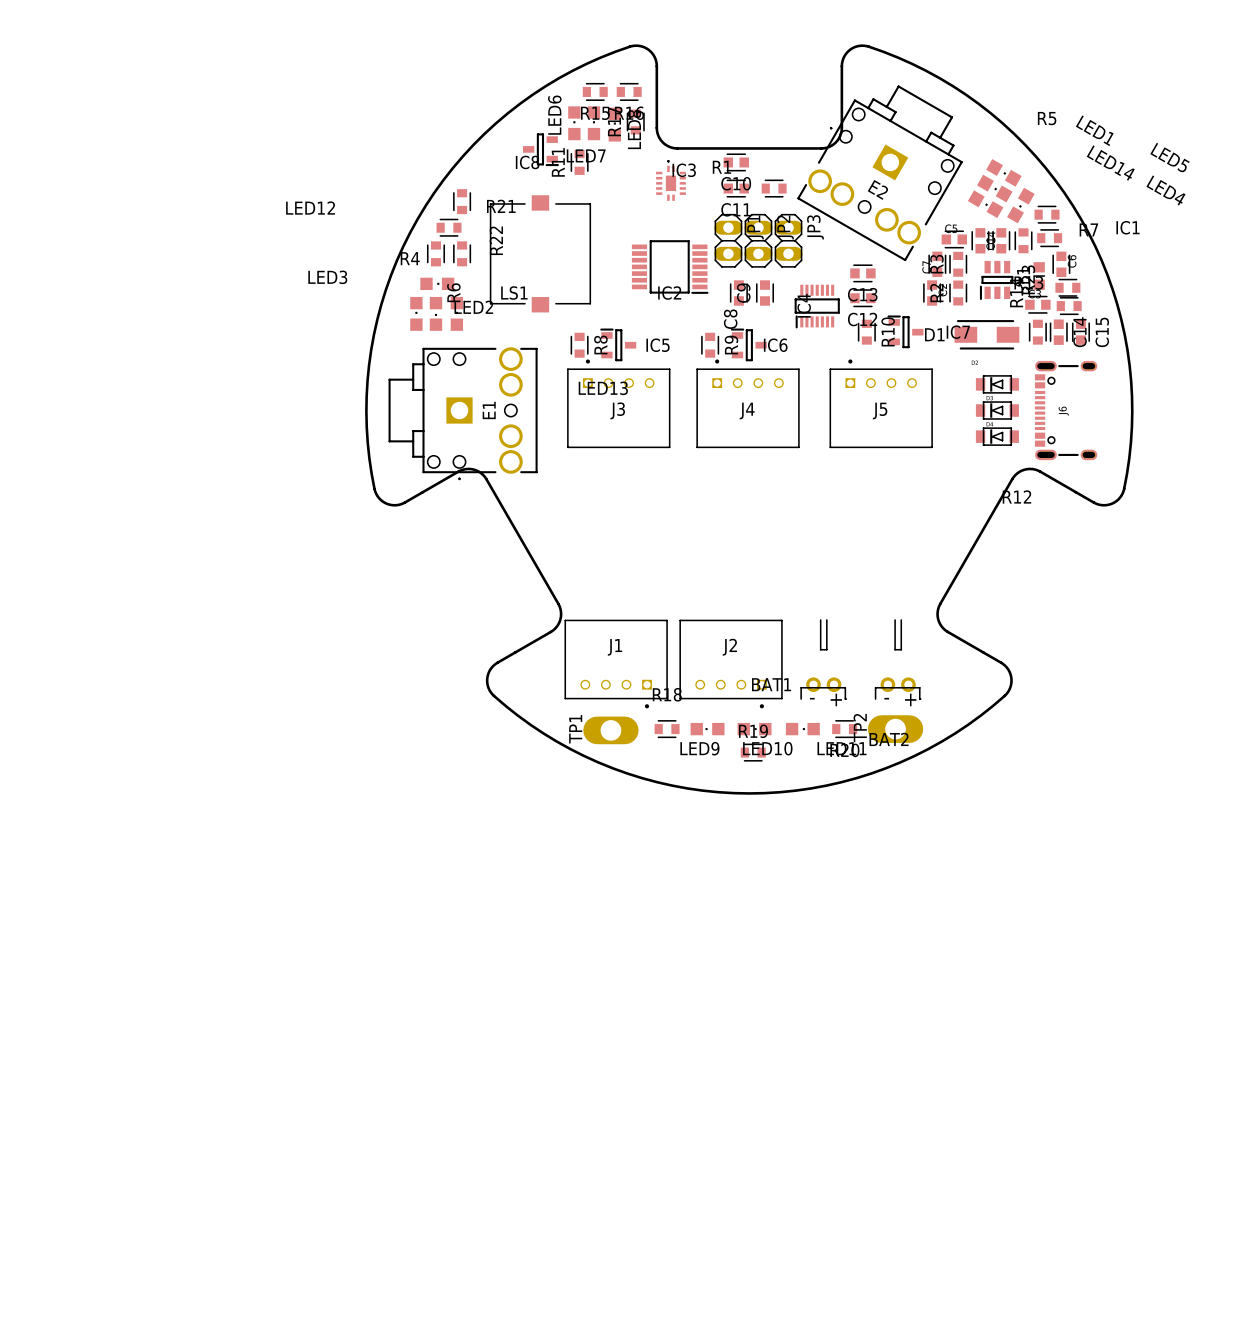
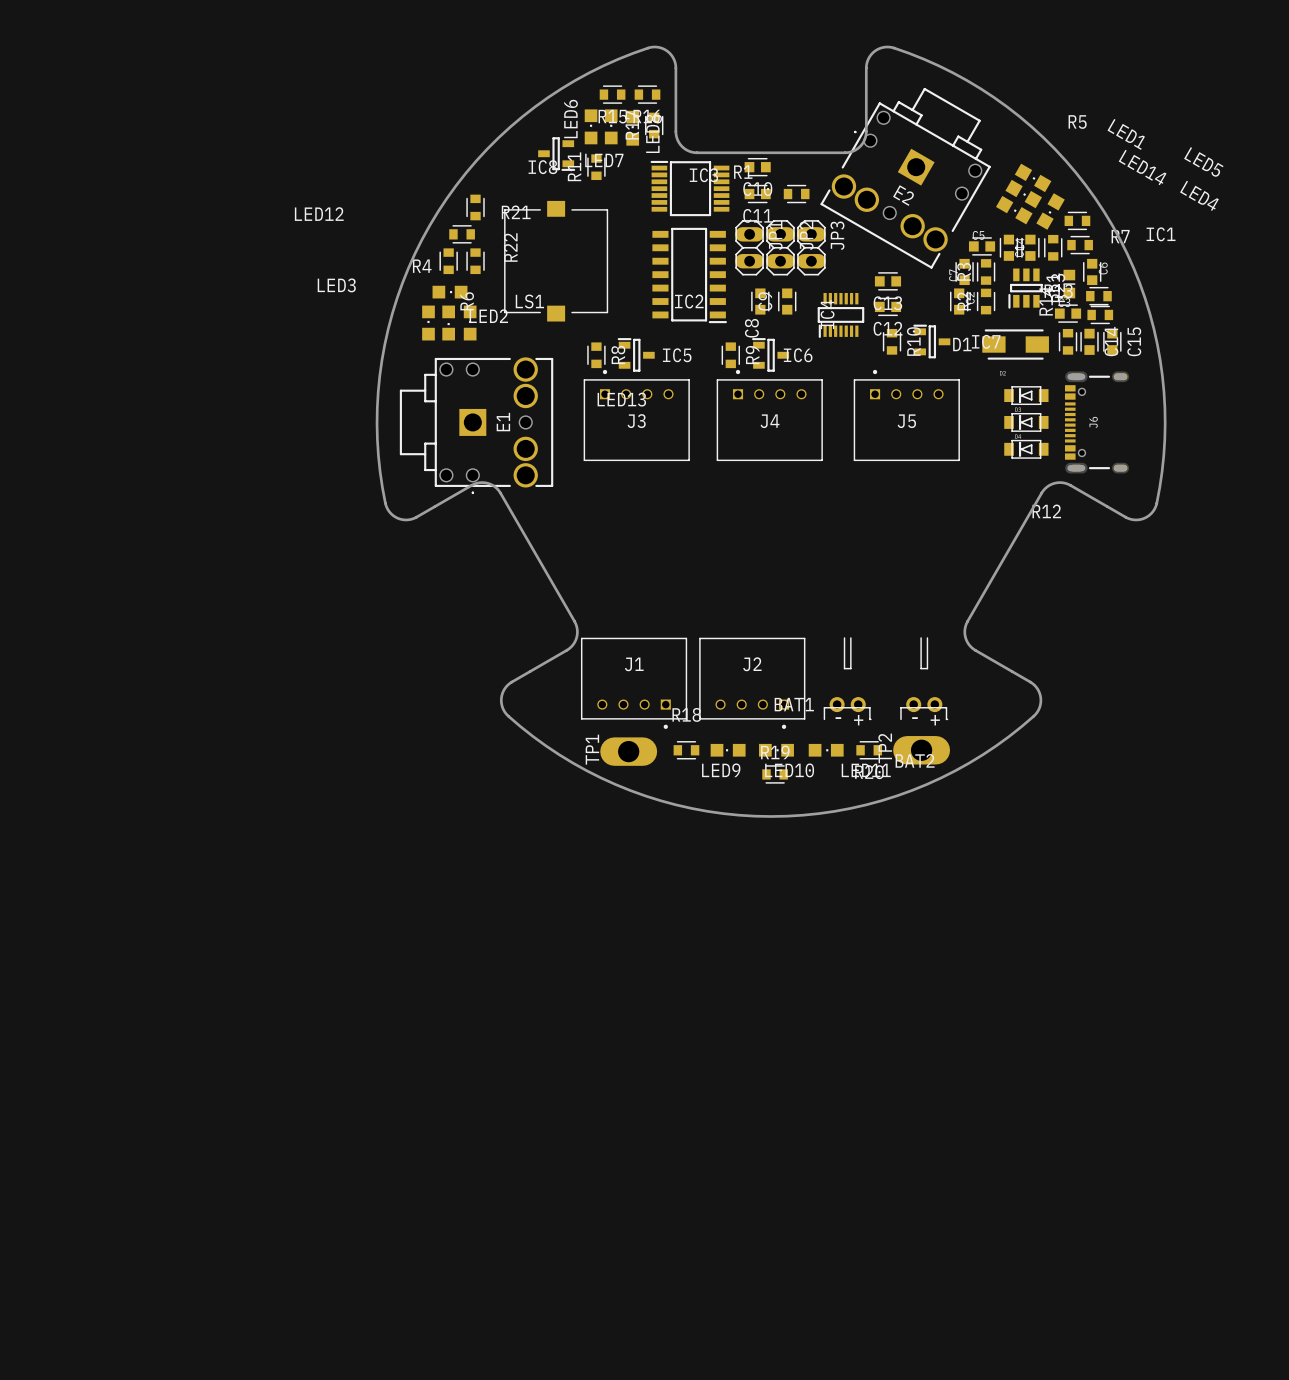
IC3 footprint: [656, 160, 686, 201] -> [650, 160, 730, 217]
IC2 footprint: [631, 240, 709, 294] -> [652, 227, 727, 324]

